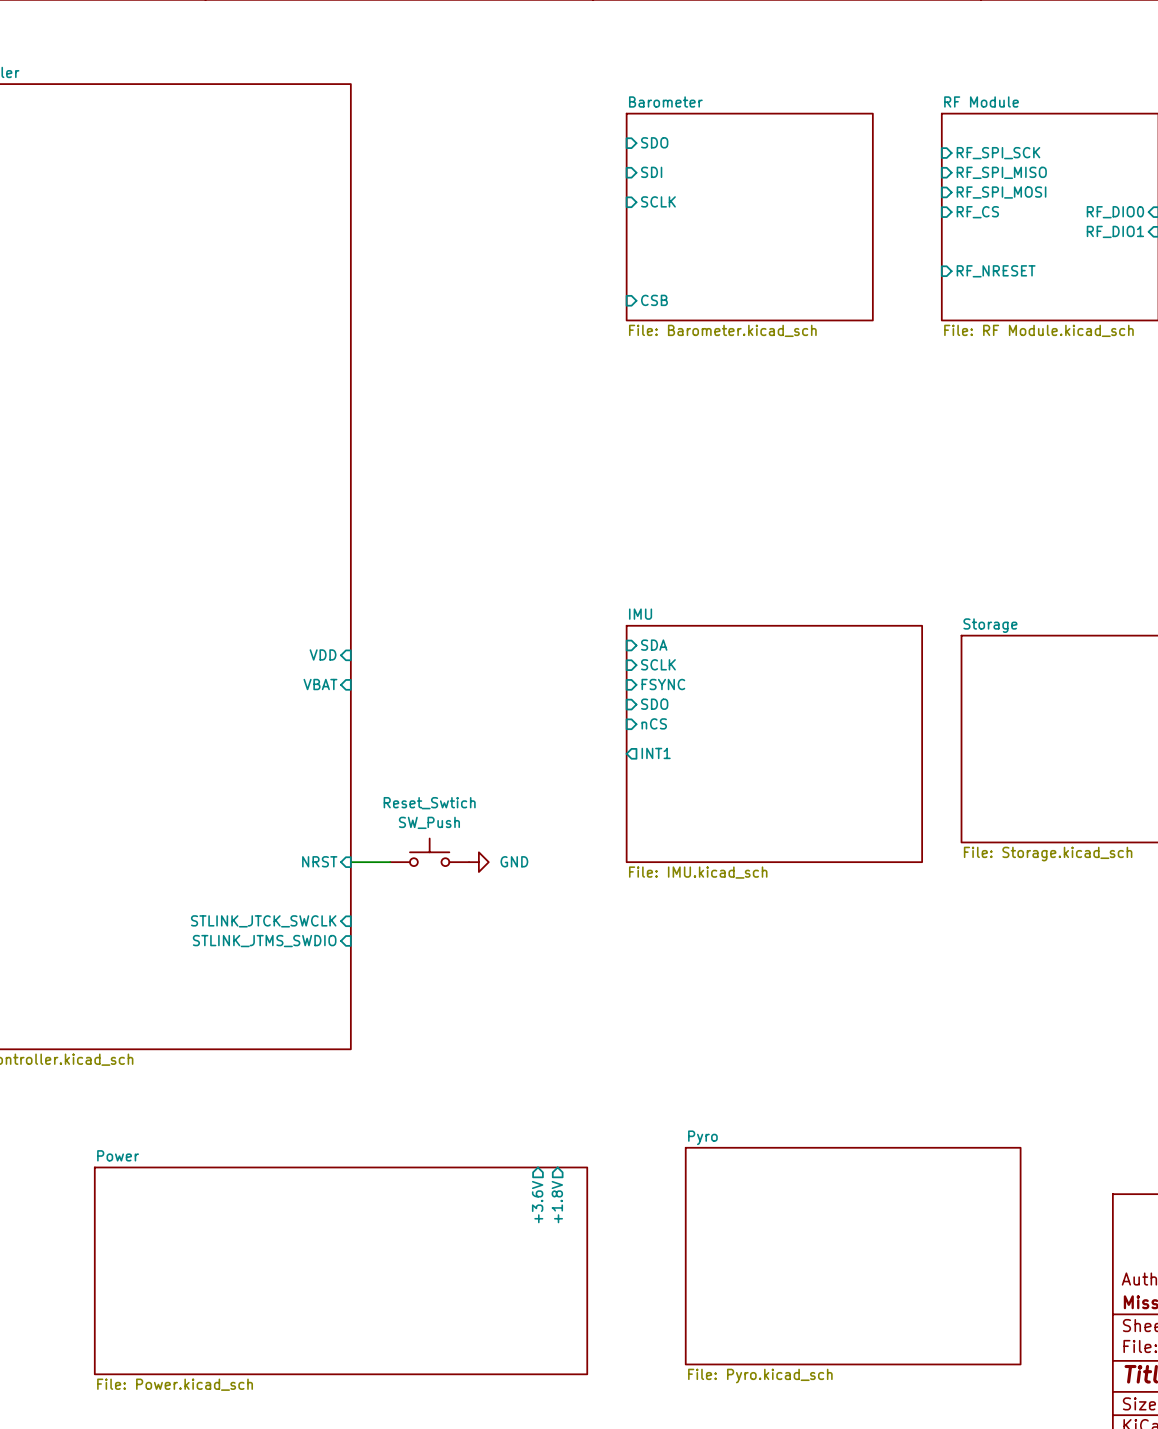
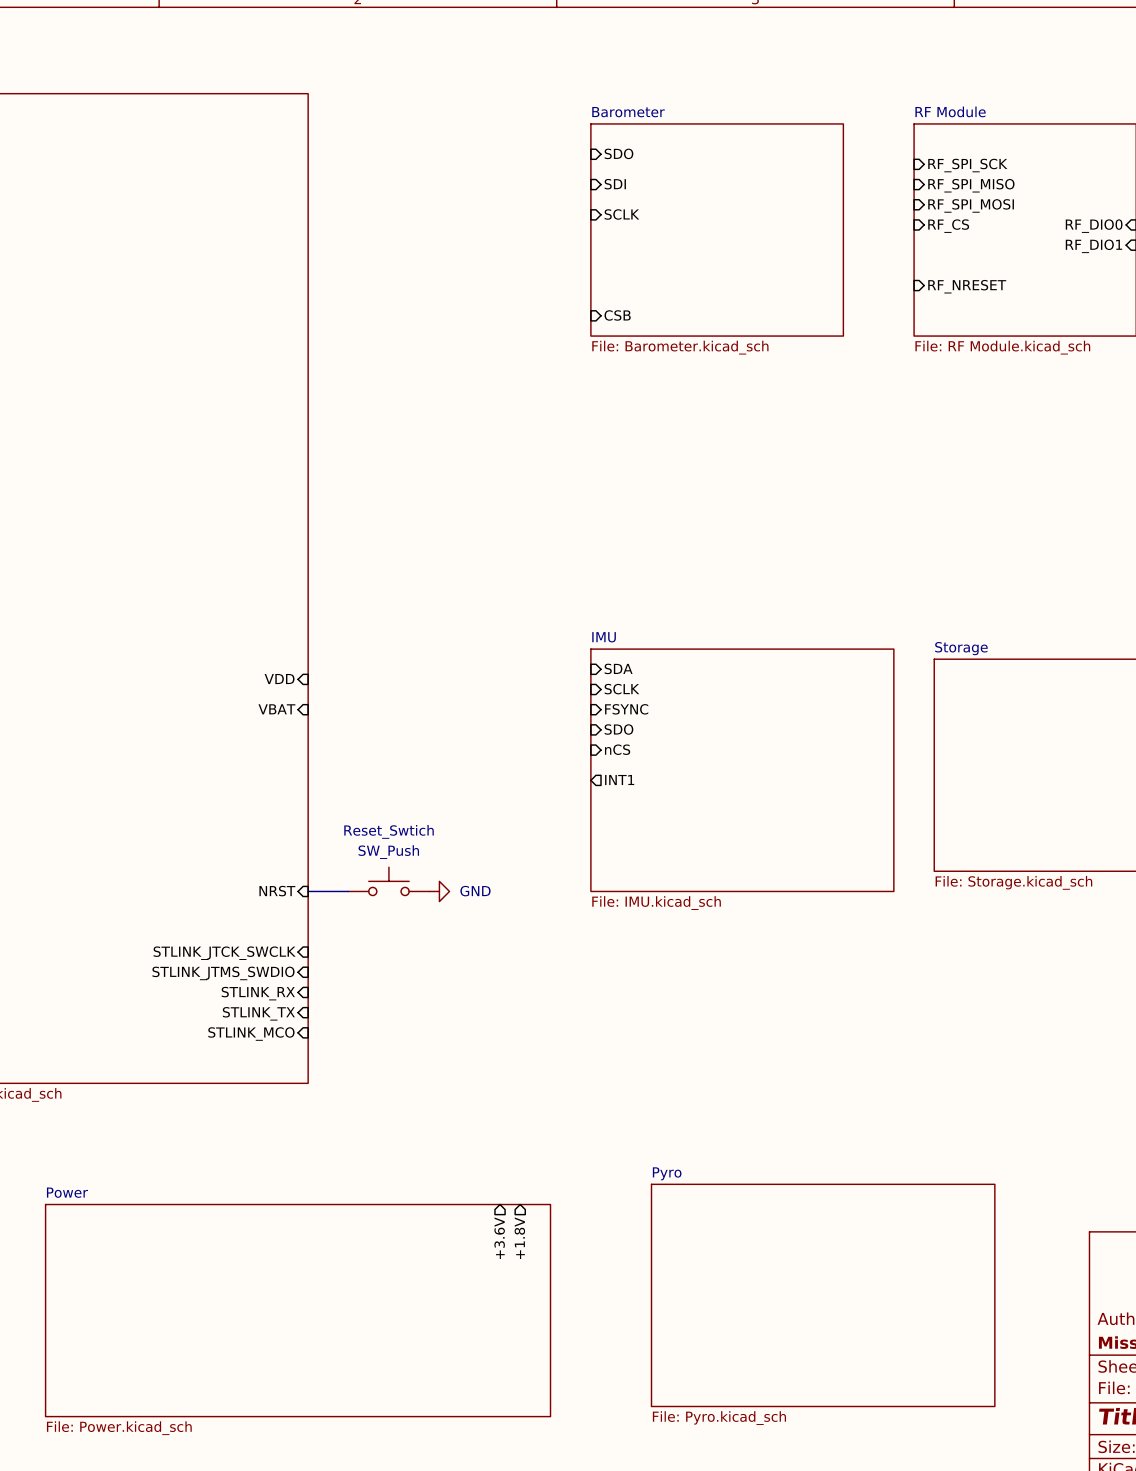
sheet pin: none -> STLINK_RX (258, 993)
sheet pin: none -> STLINK_TX (258, 1013)
sheet pin: none -> STLINK_MCO (251, 1034)

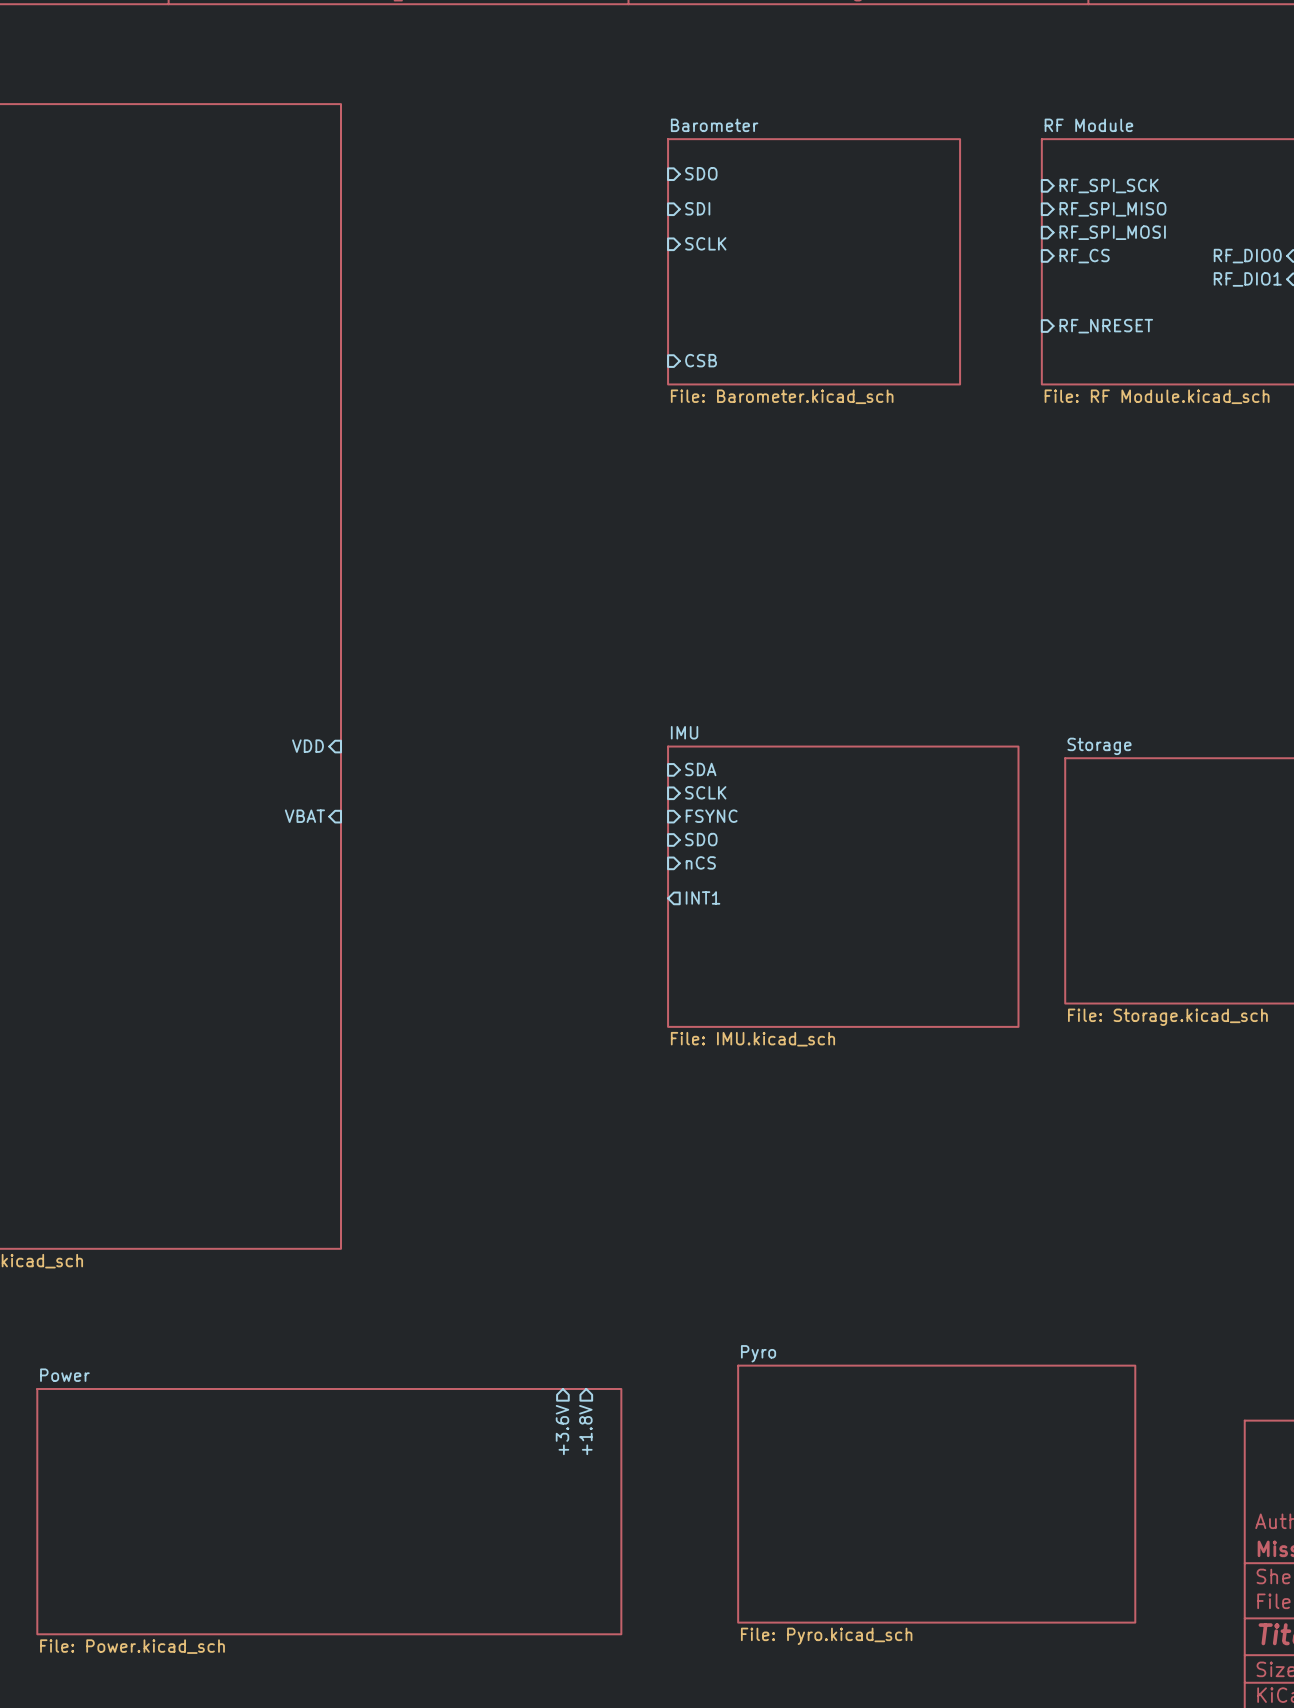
sheet pin position: VDD (279, 679) -> VDD (307, 746)
Reset_Swtich: SW_Push (388, 881) -> none
sheet pin: NRST (277, 891) -> none
wire: (308, 891) (348, 891) -> none
power symbol: GND (439, 891) -> none
sheet pin: STLINK_JTCK_SWCLK (224, 953) -> none
sheet pin: STLINK_JTMS_SWDIO (223, 973) -> none
sheet pin: STLINK_RX (258, 993) -> none
sheet pin: STLINK_TX (258, 1013) -> none
sheet pin: STLINK_MCO (251, 1034) -> none

